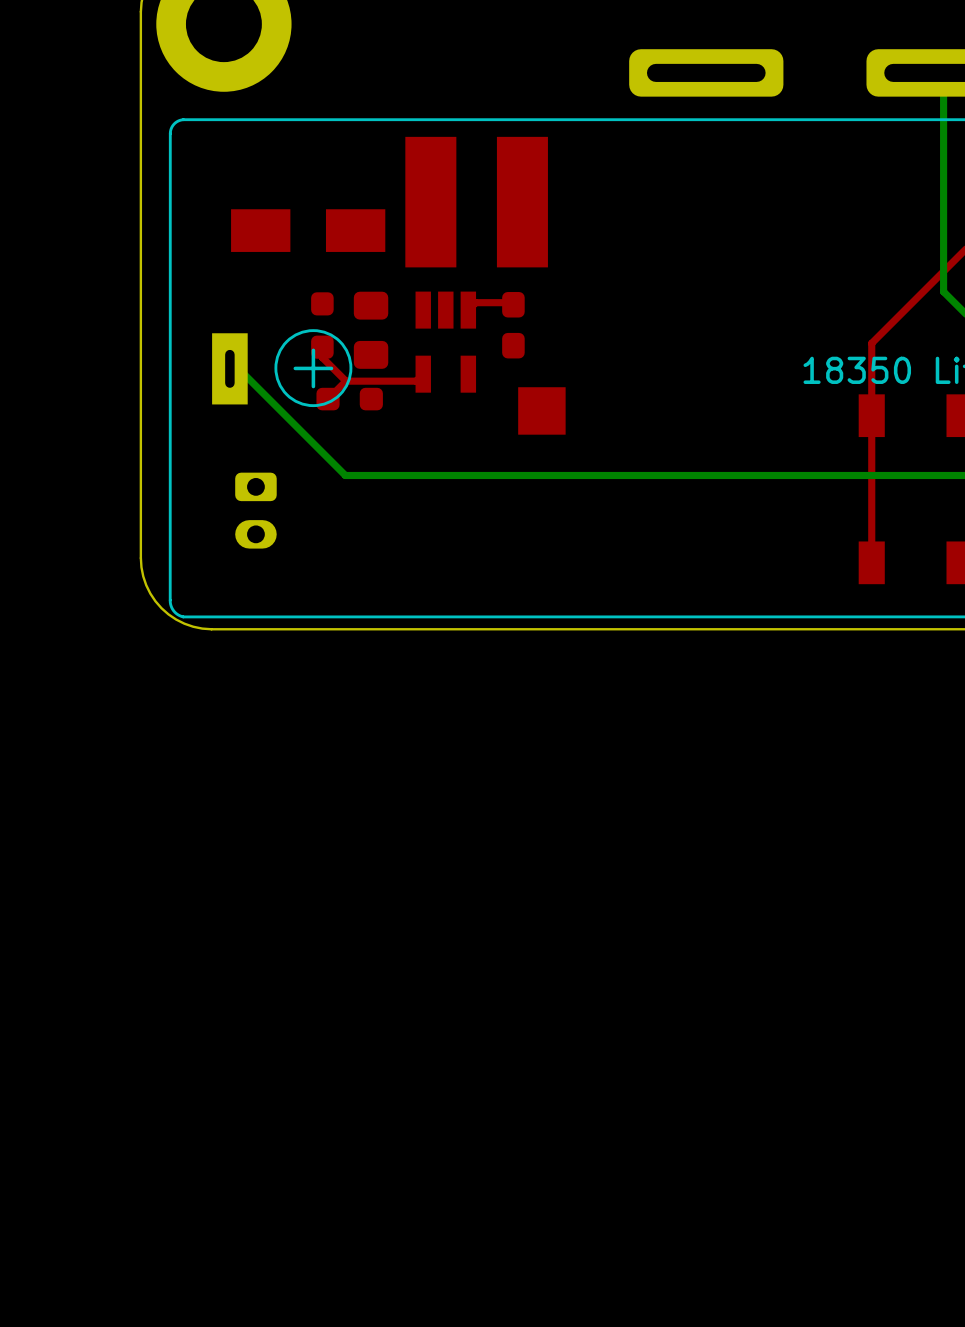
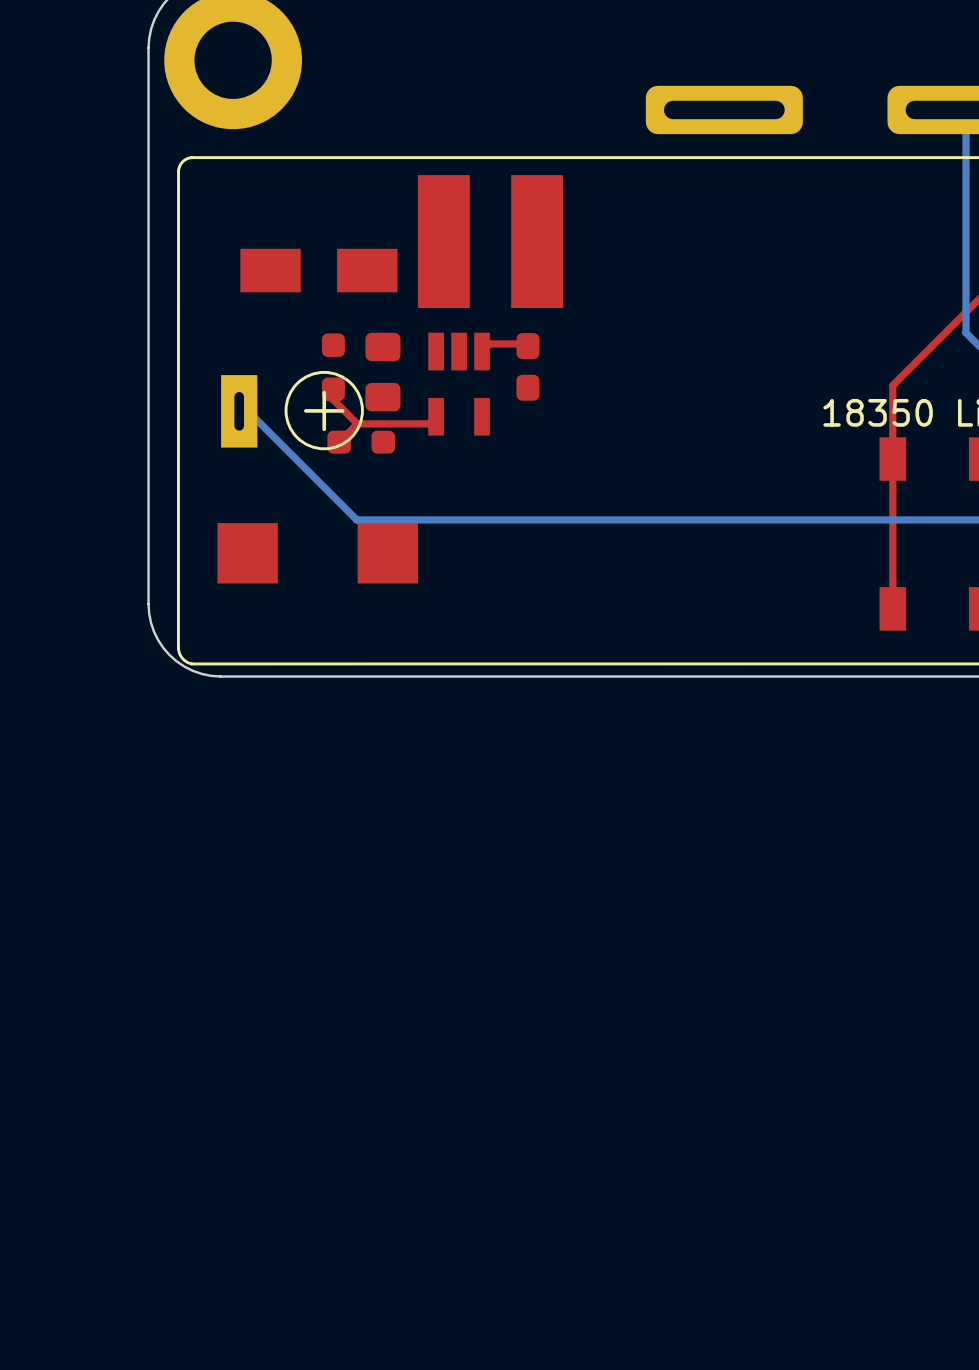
part: (541, 410) -> none
part footprint: [235, 472, 277, 549] -> [217, 523, 278, 584]
part: none -> (387, 553)

